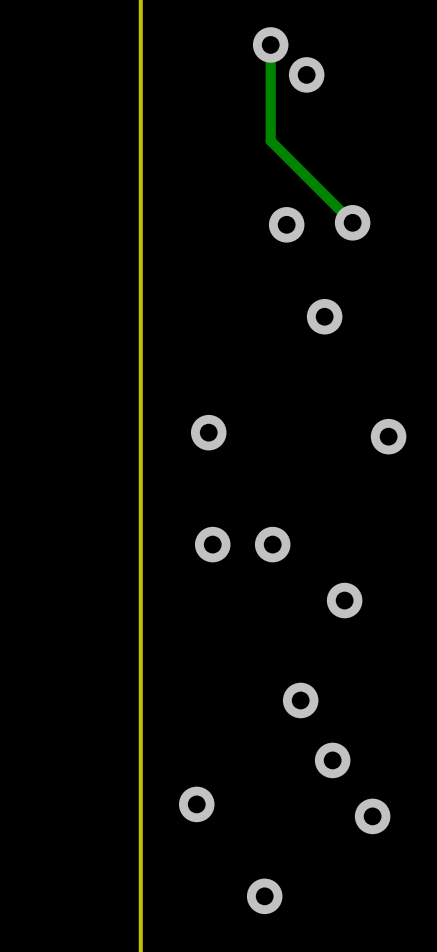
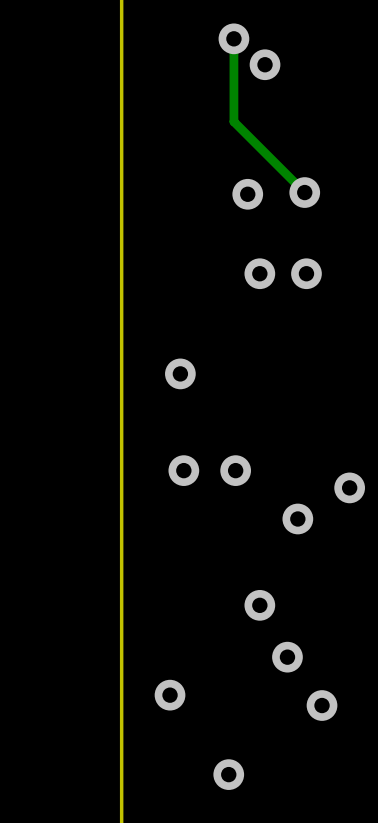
via: none -> (259, 273)
via: (324, 316) -> none
via: none -> (306, 273)
via: (388, 436) -> none
via: none -> (349, 487)

